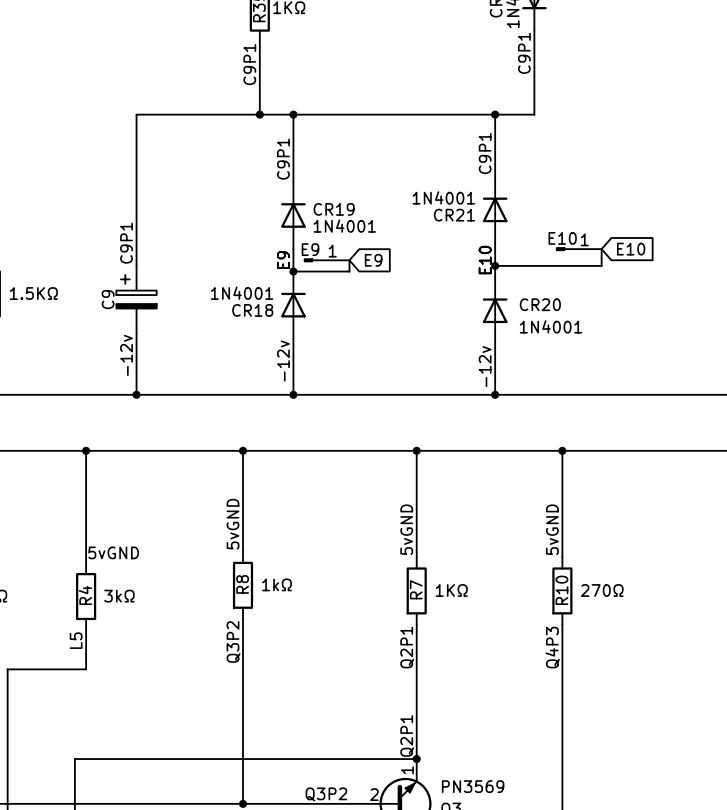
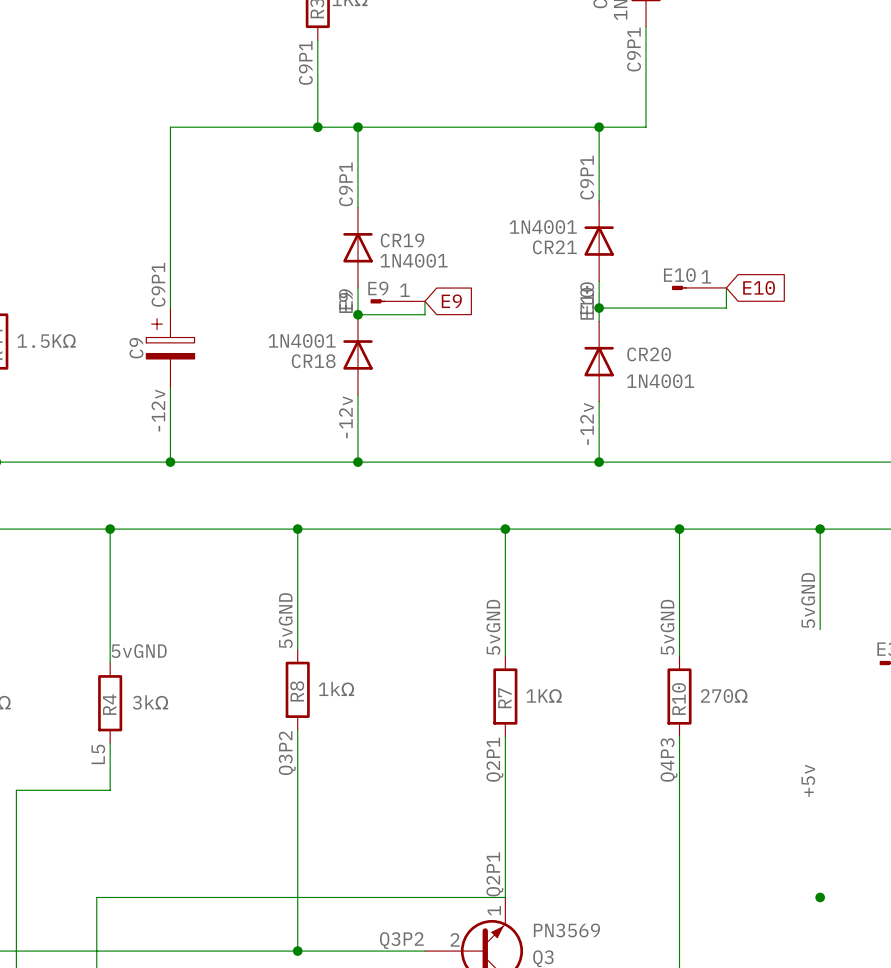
wire: none -> (820, 529) (820, 629)
junction: none -> (820, 529)
label: none -> 5vGND (808, 600)
label: none -> +5v (808, 780)
junction: (416, 759) -> none
junction: none -> (820, 897)

